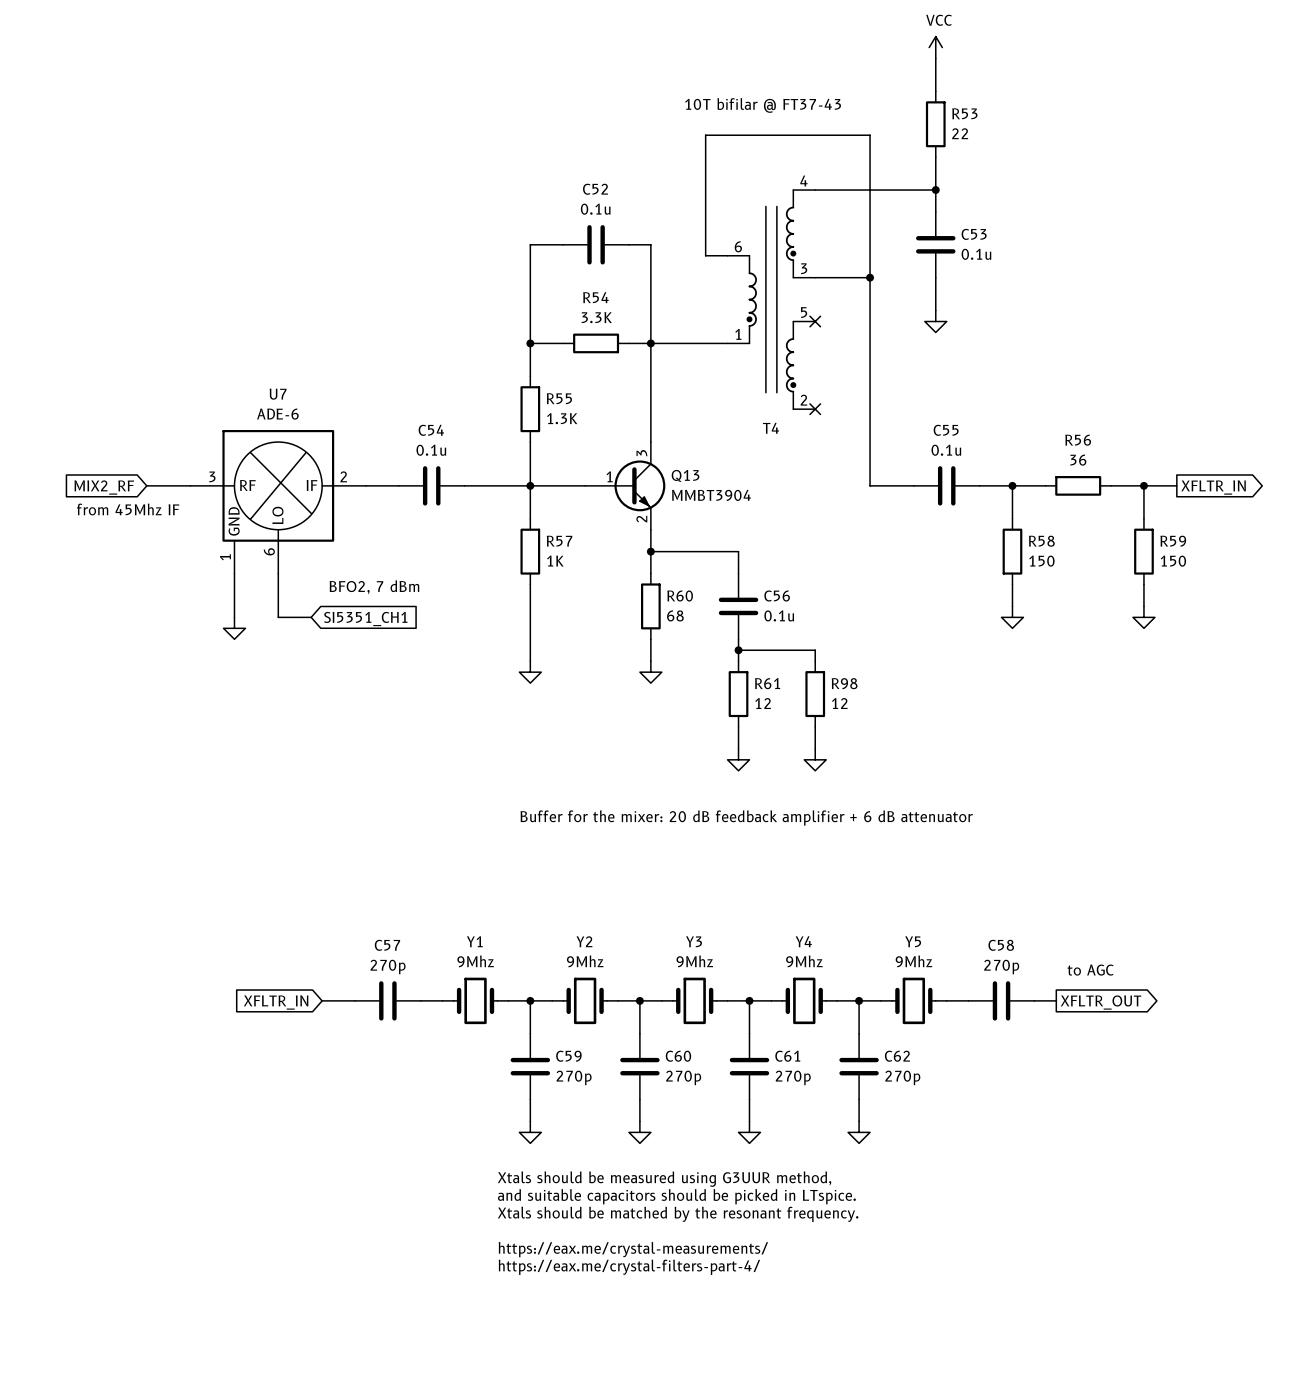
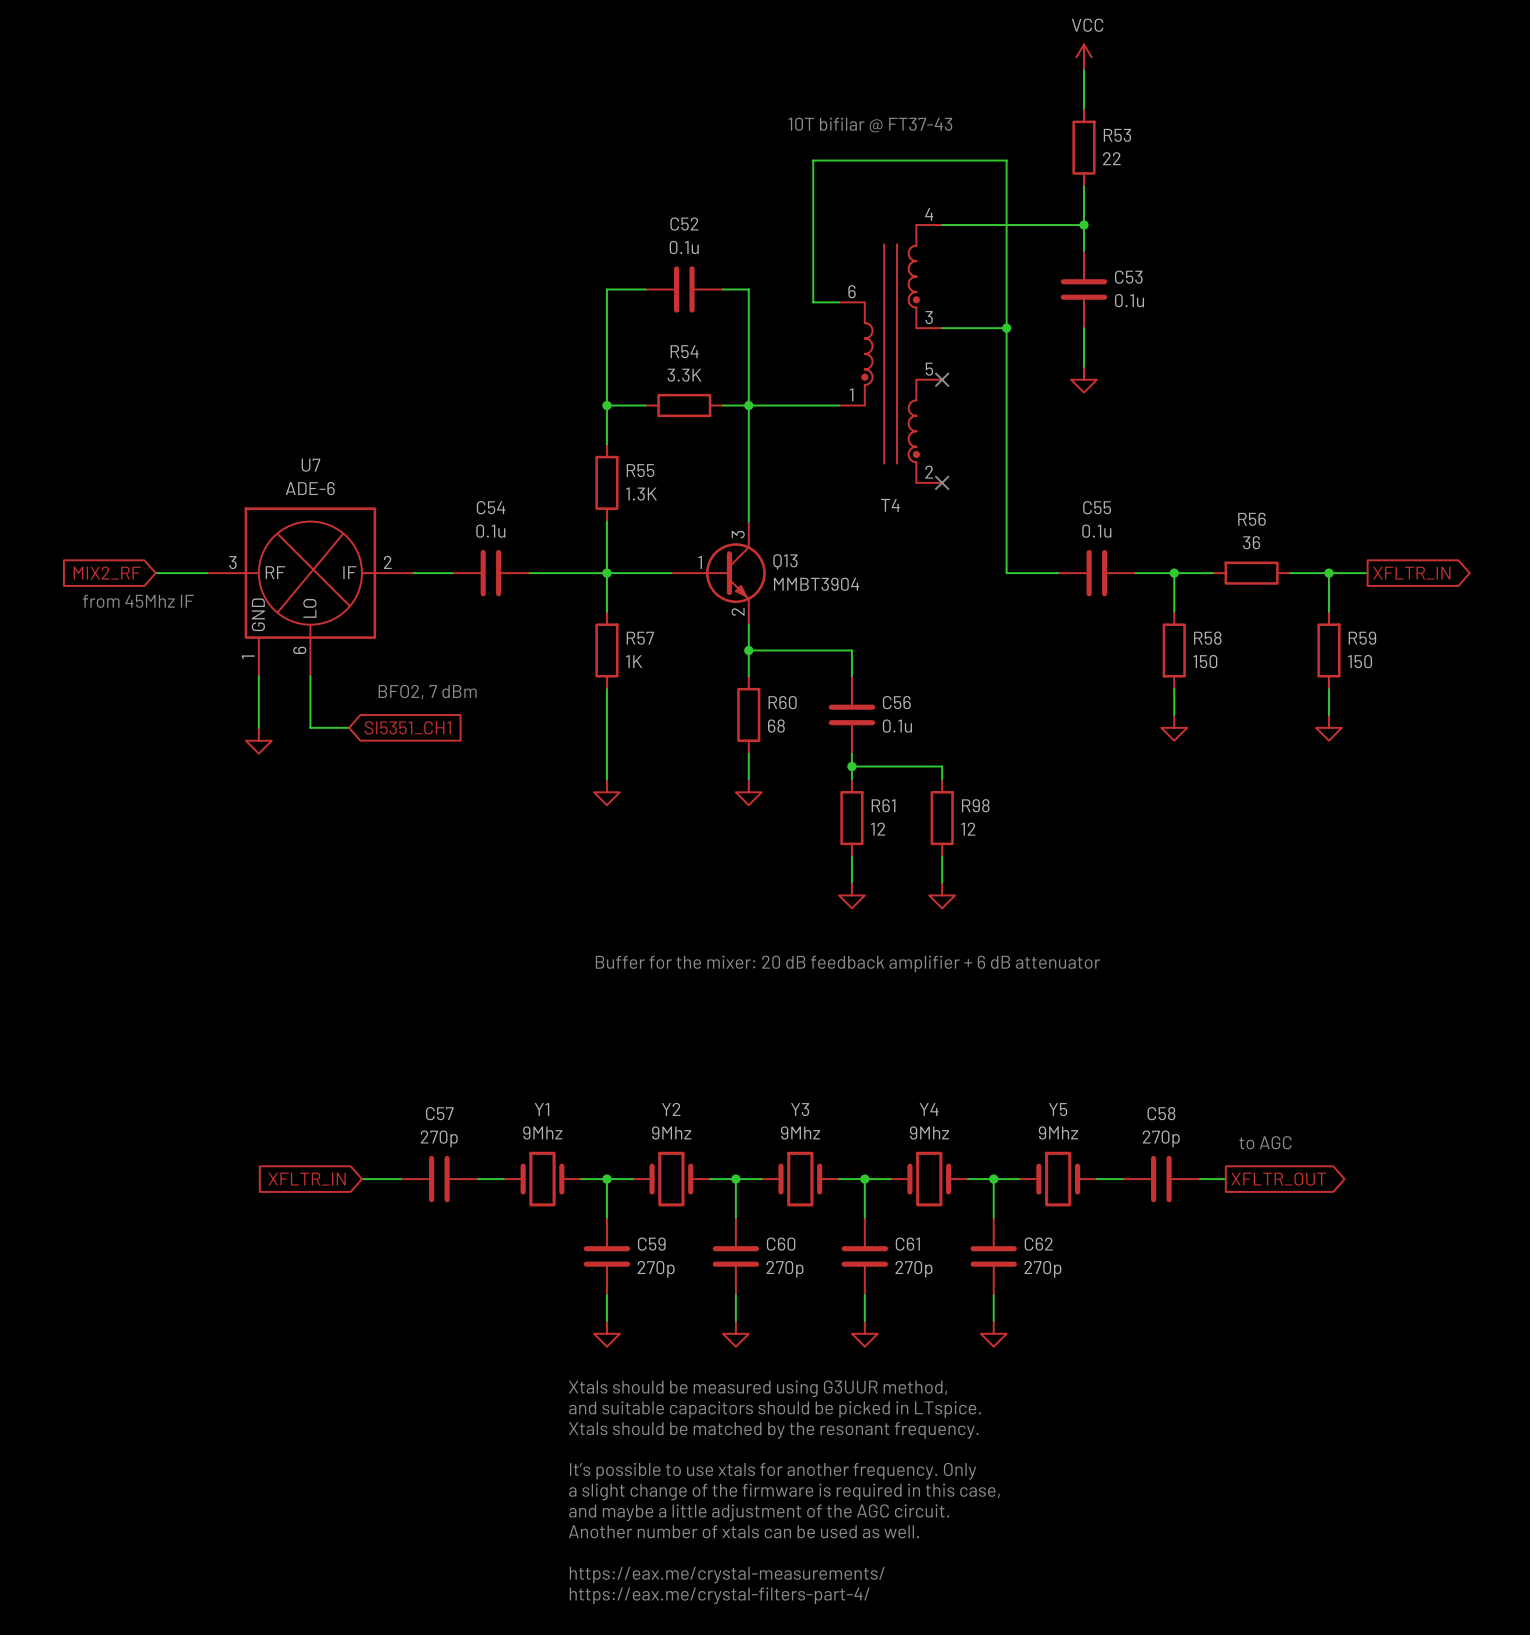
text: https://eax.me/crystal-measurements/ (633, 1249) -> It’s possible to use xtals for another frequency. Only (773, 1471)
text: https://eax.me/crystal-filters-part-4/ (629, 1267) -> a slight change of the firmware is required in this case, (784, 1491)
text: none -> and maybe a little adjustment of the AGC circuit. (759, 1512)
text: none -> Another number of xtals can be used as well. (743, 1531)
text: none -> https://eax.me/crystal-measurements/ (727, 1575)
text: none -> https://eax.me/crystal-filters-part-4/ (719, 1595)

